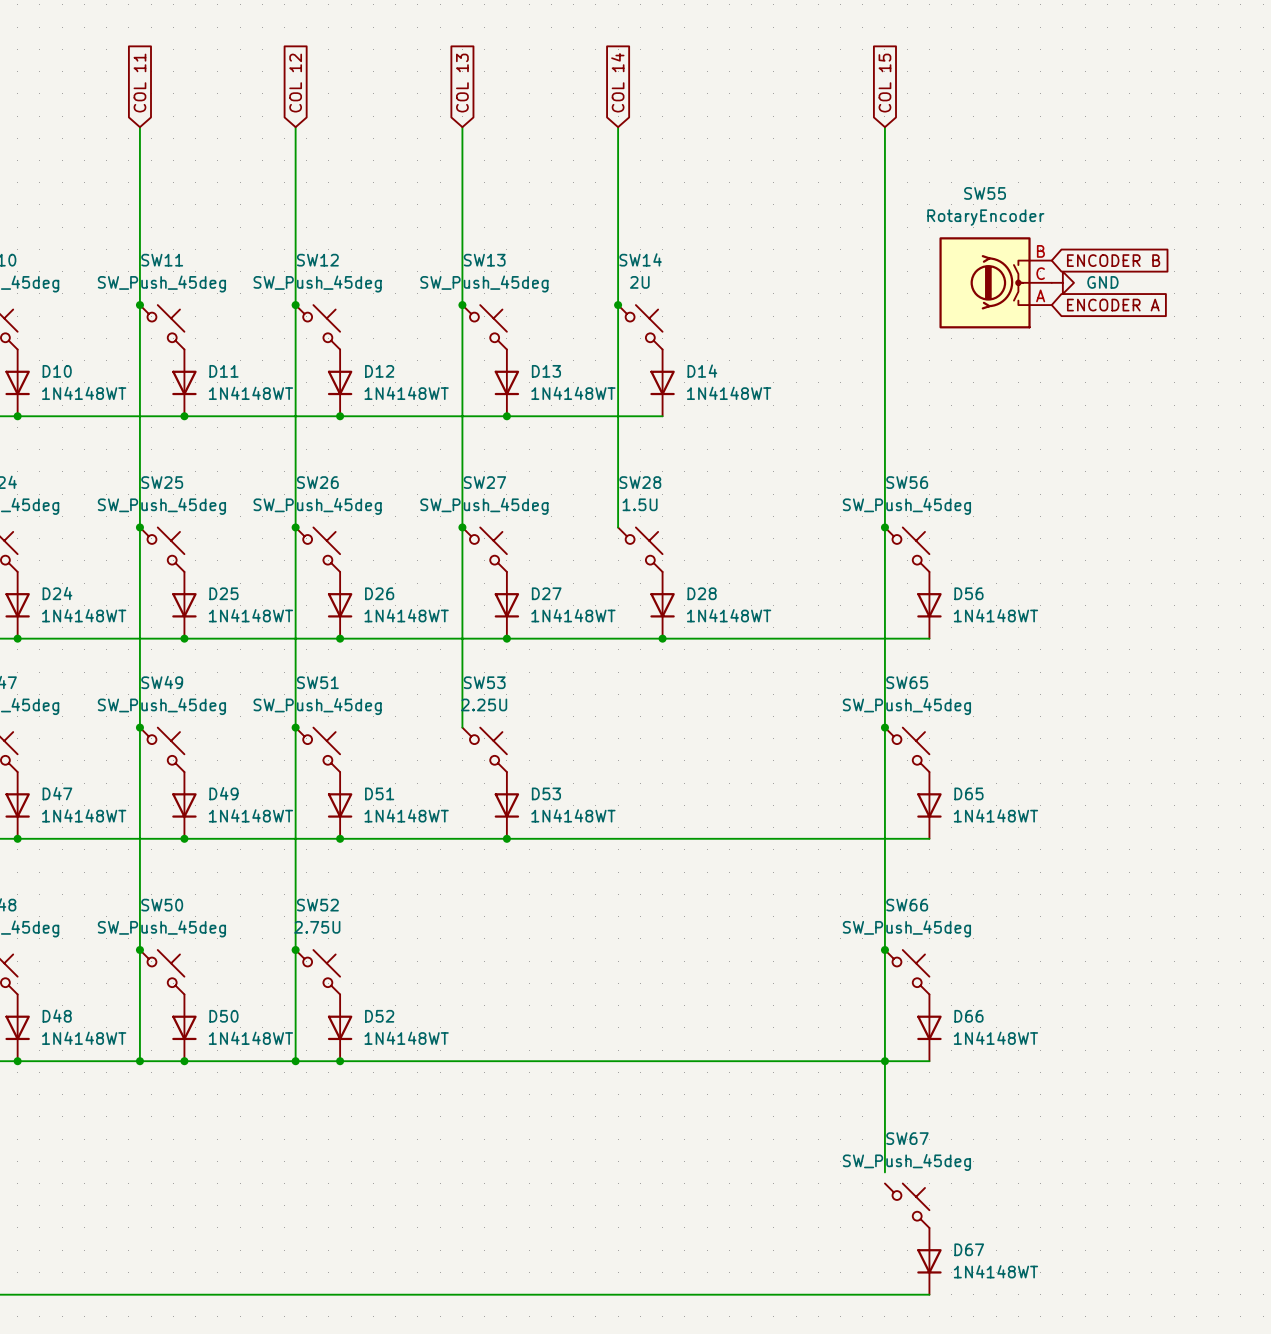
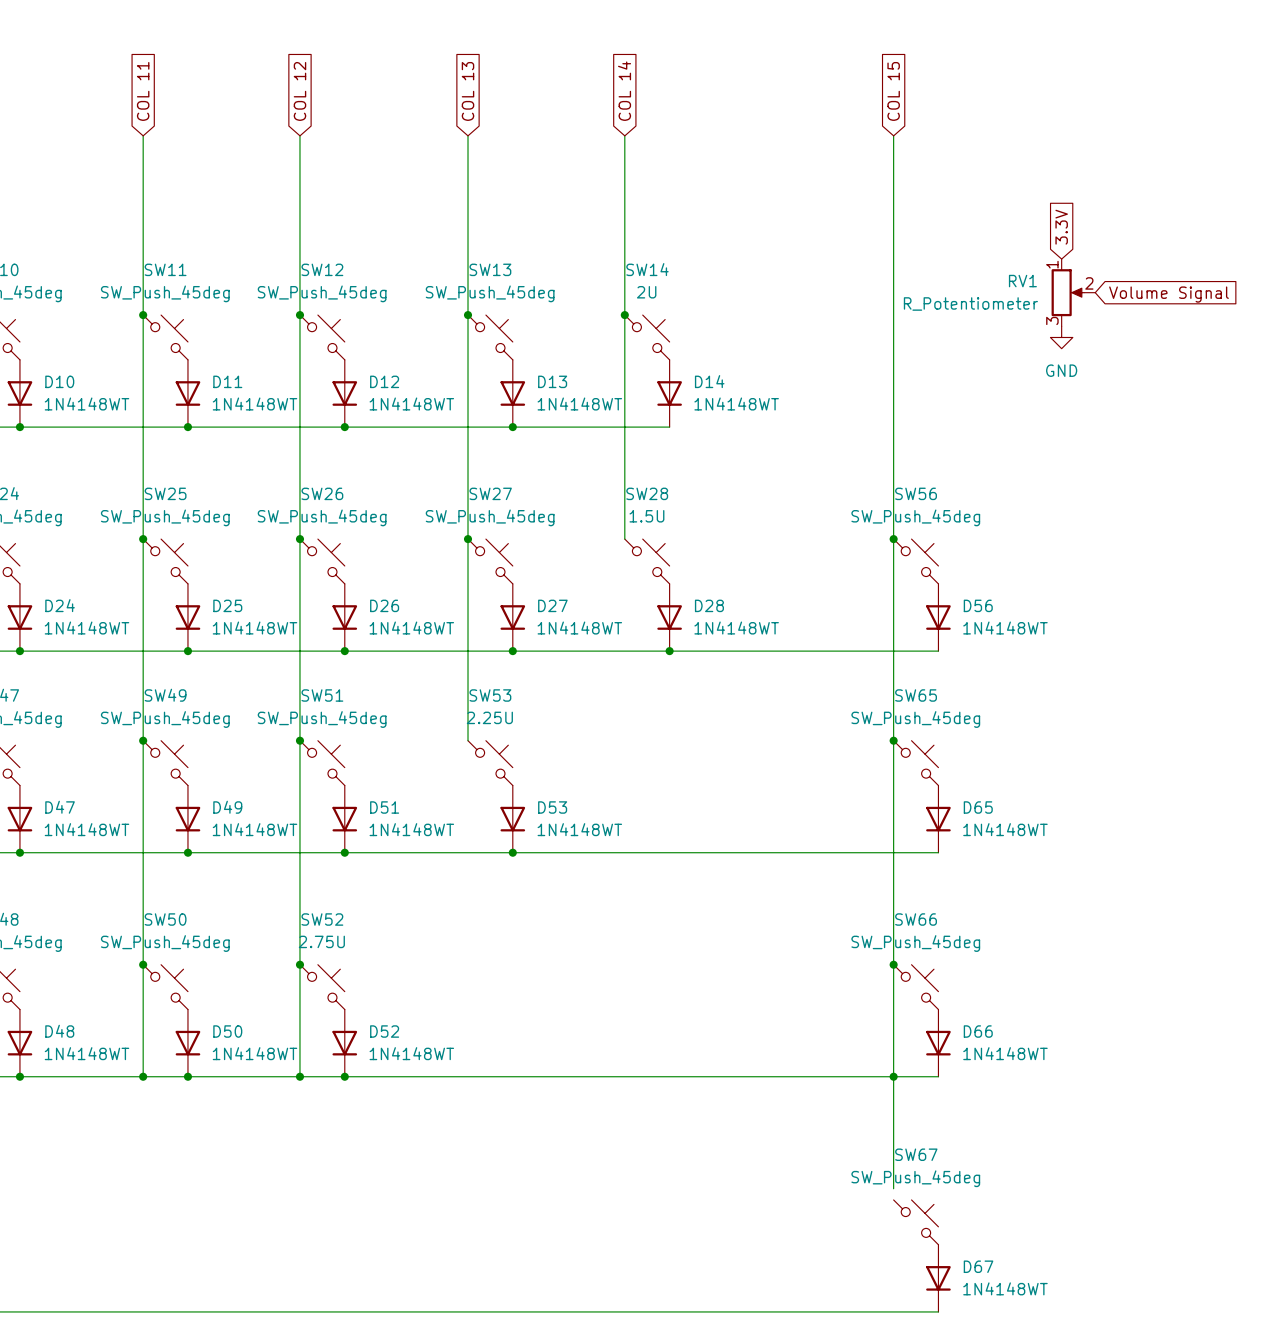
global label: none -> 3.3V (1061, 227)
global label: ENCODER B (1113, 260) -> none
SW55: RotaryEncoder (995, 282) -> none
power symbol rotation: 0° (1062, 282) -> 90° clockwise (1061, 337)
power symbol position: GND (1062, 282) -> GND (1061, 337)
RV1: none -> R_Potentiometer (1073, 292)
global label: none -> Volume Signal (1169, 294)
global label: ENCODER A (1113, 305) -> none

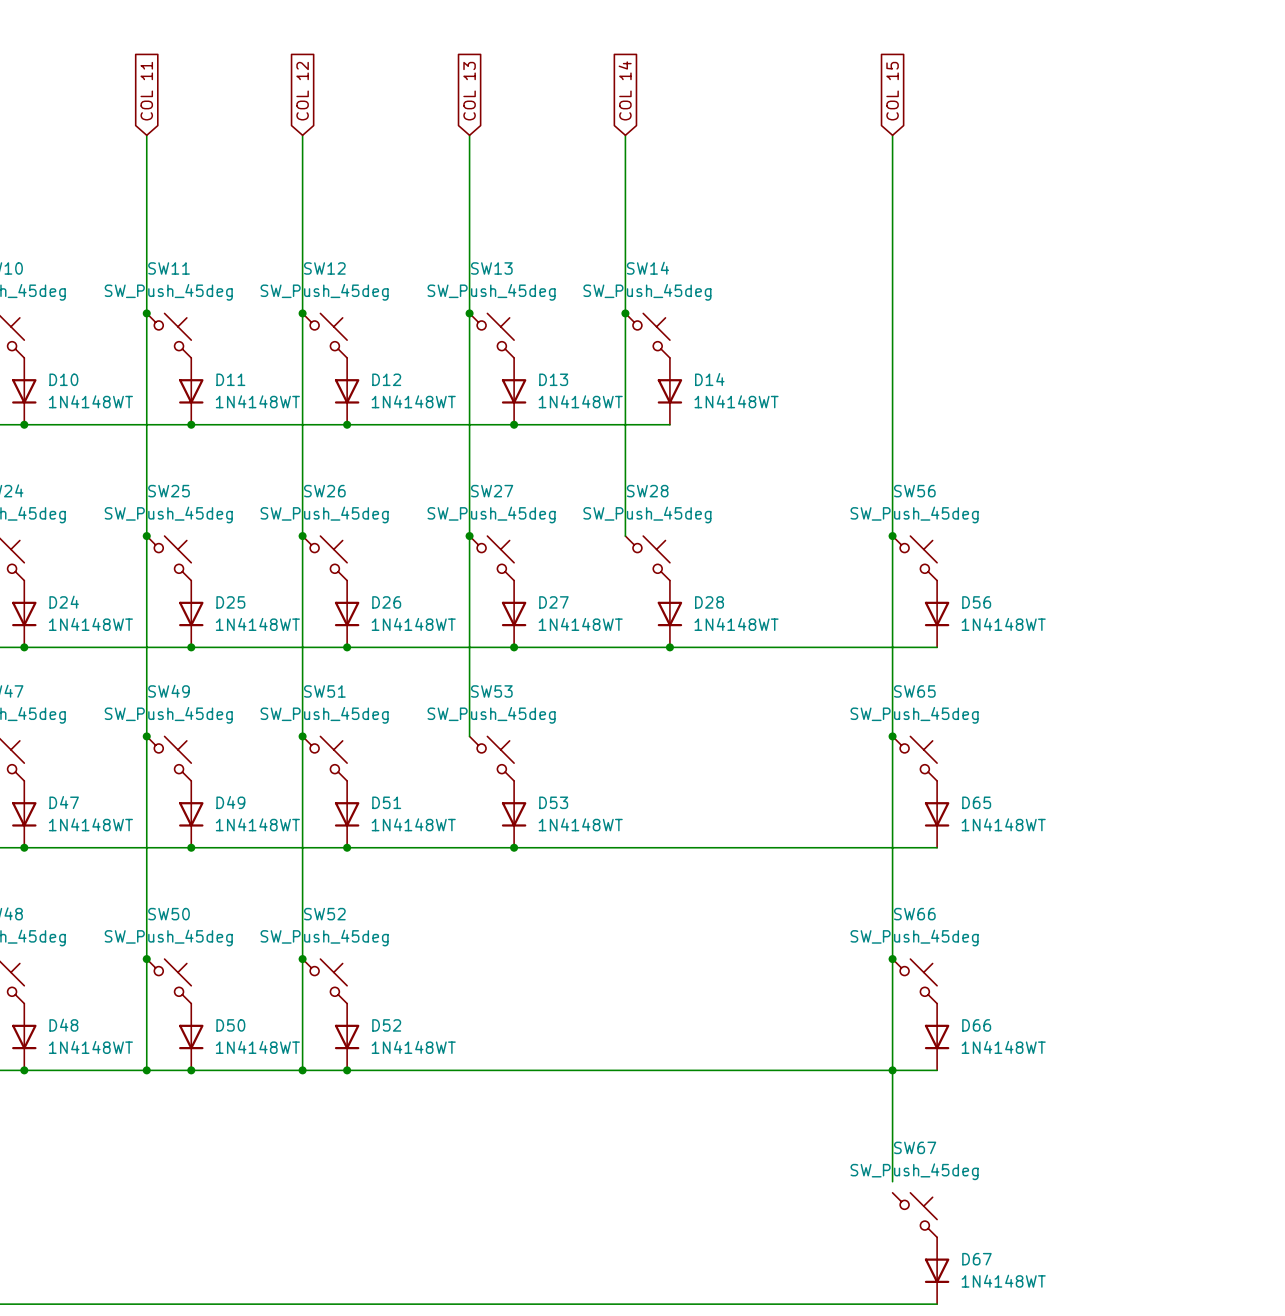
global label: 3.3V (1061, 227) -> none
SW14 value: 2U (646, 292) -> SW_Push_45deg (647, 292)
RV1: R_Potentiometer (1073, 292) -> none
global label: Volume Signal (1169, 294) -> none
power symbol: GND (1061, 337) -> none
SW28 value: 1.5U (646, 516) -> SW_Push_45deg (647, 514)
SW53 value: 2.25U (489, 717) -> SW_Push_45deg (491, 715)
SW52 value: 2.75U (321, 941) -> SW_Push_45deg (324, 937)

